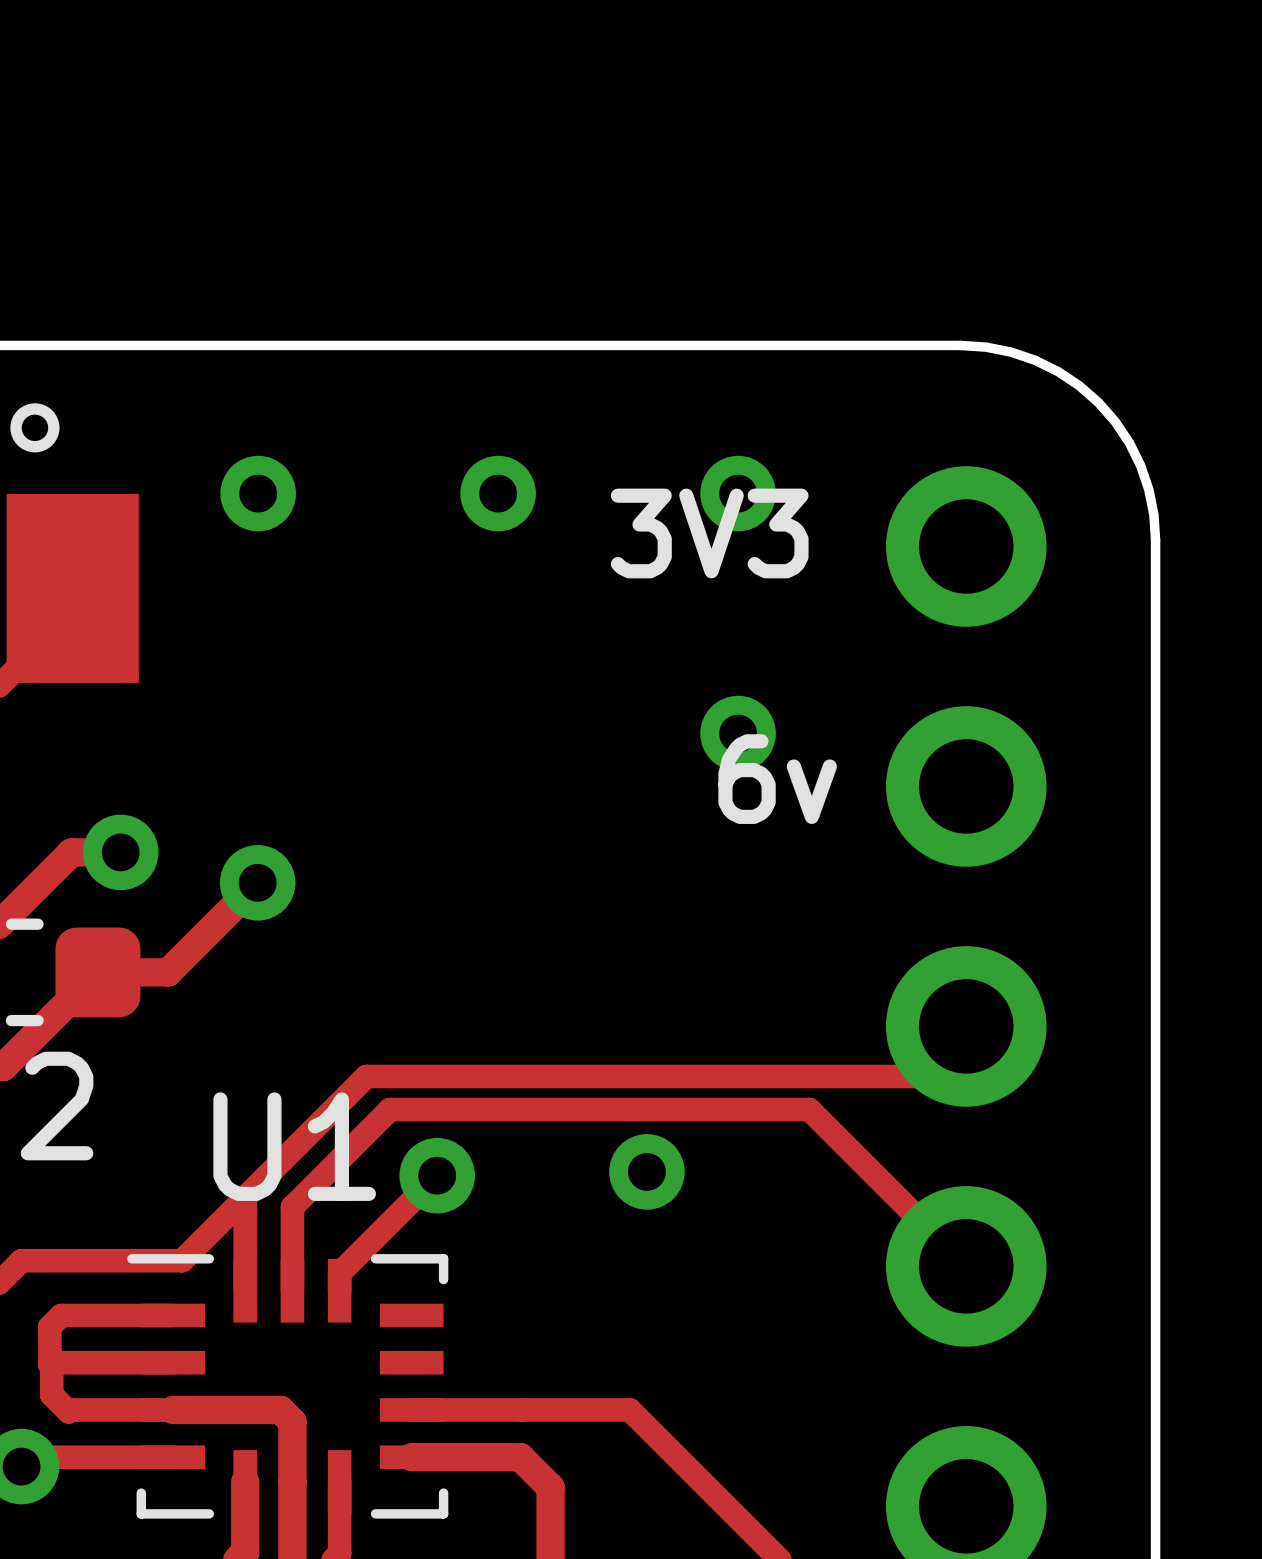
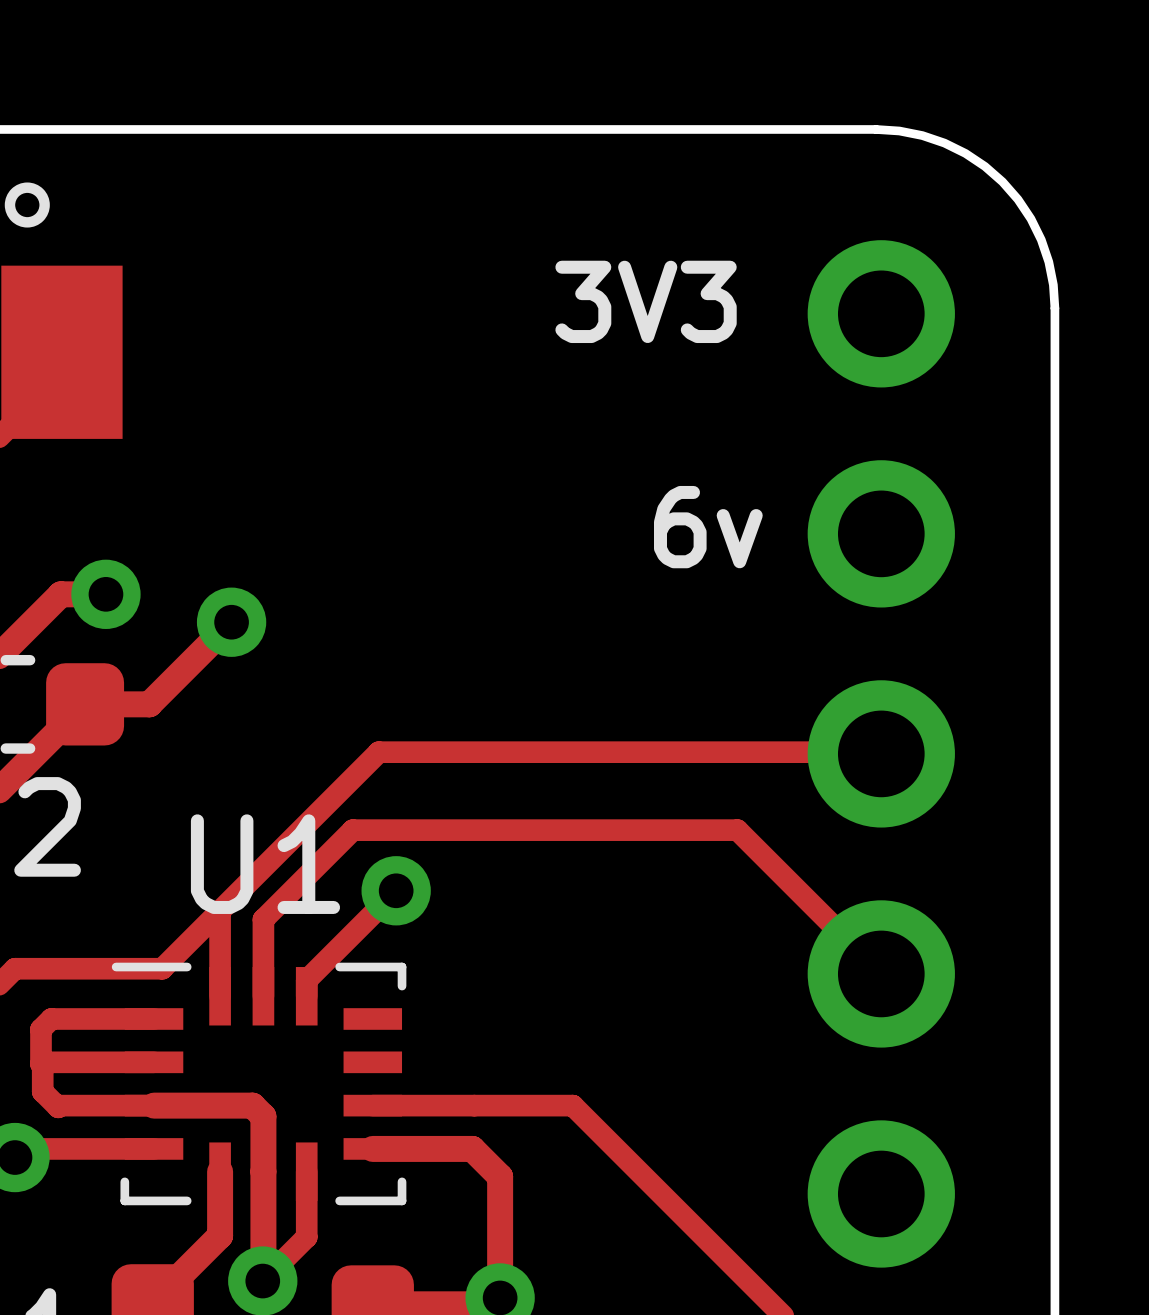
via: (258, 493) -> none
via: (498, 493) -> none
via: (738, 493) -> none
via: (738, 733) -> none
track: (966, 1026) (916, 1076) (366, 1076) -> (881, 753) (879, 752) (378, 752) (331, 799)
via: (646, 1171) -> none

